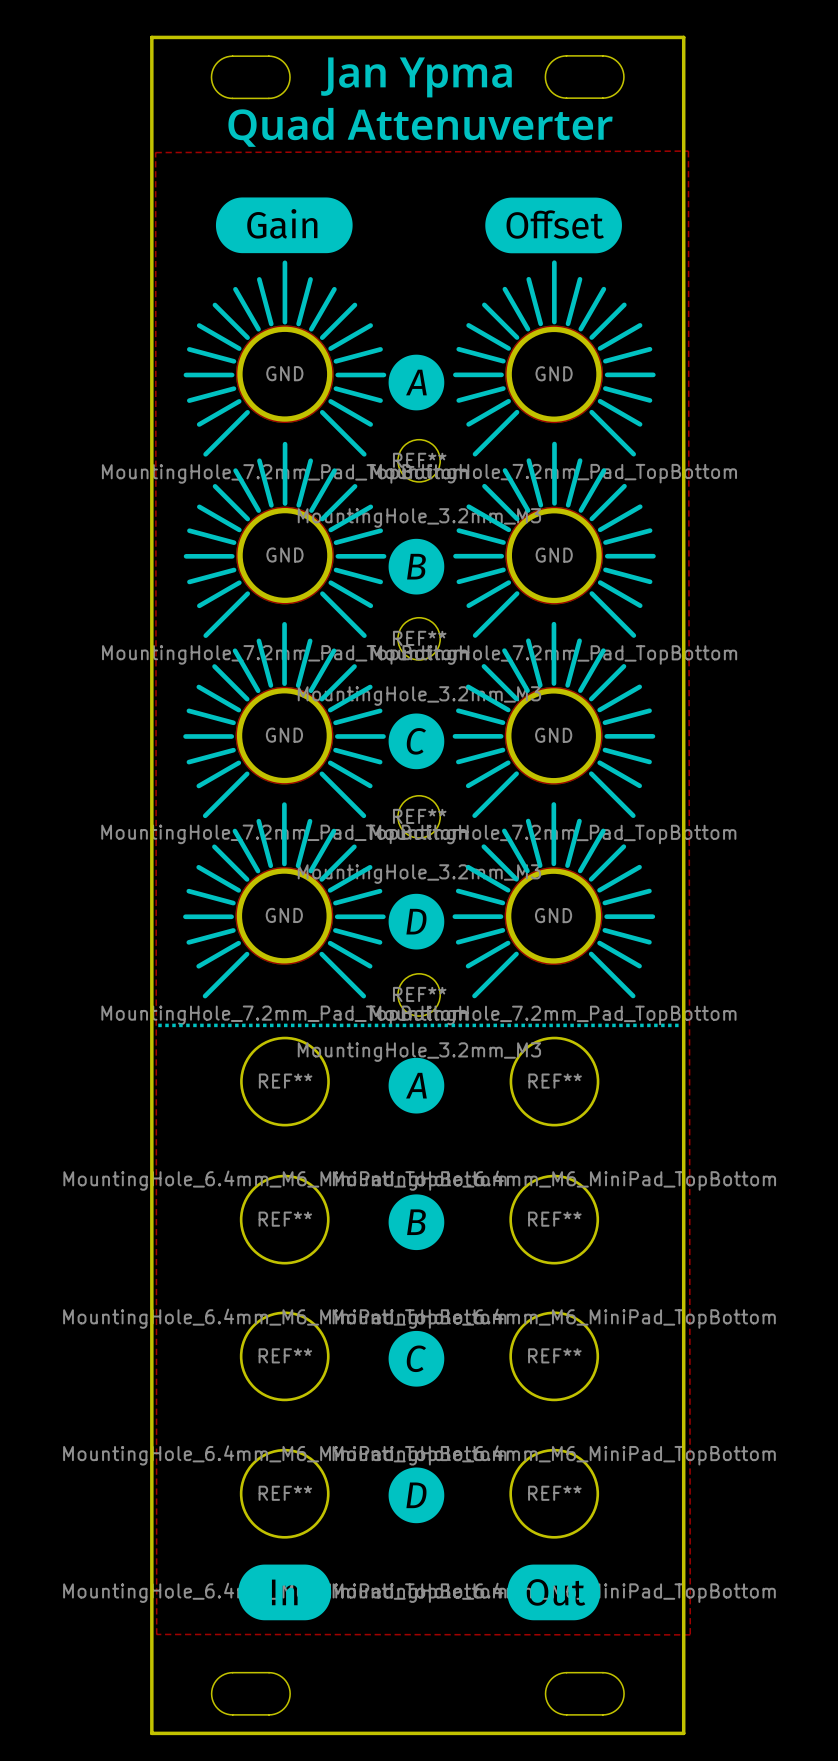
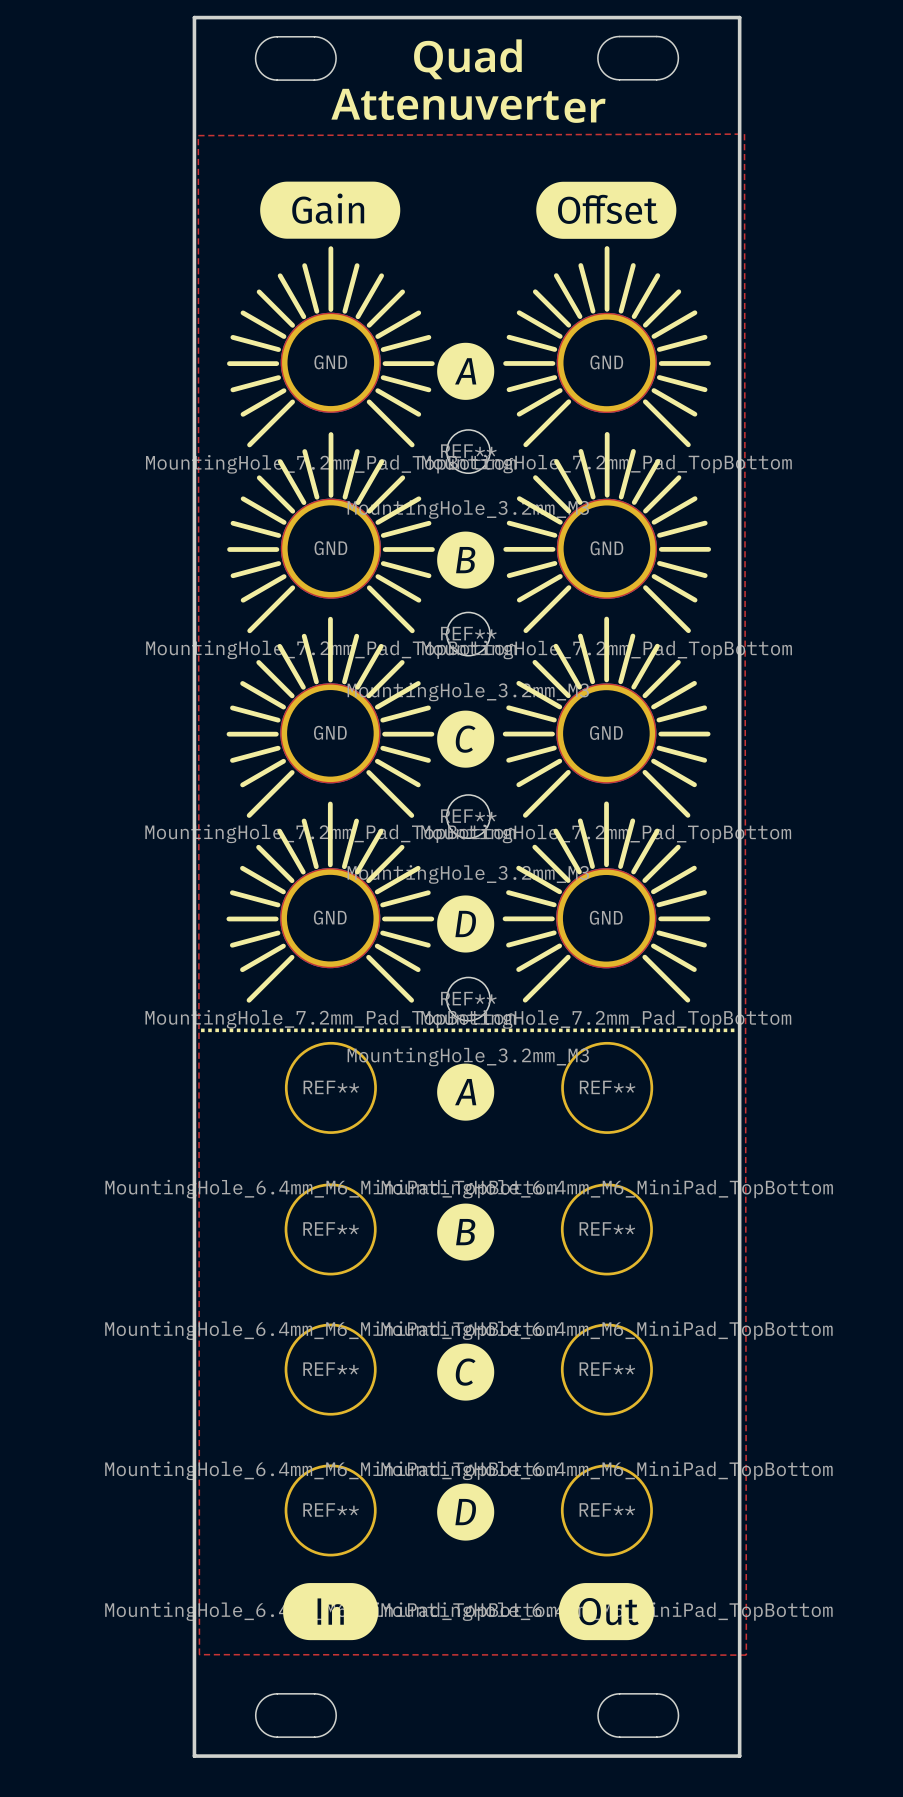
drawing: [321, 57, 386, 96] -> none
drawing shape: [399, 57, 425, 88] -> [448, 48, 470, 73]
drawing shape: [427, 64, 448, 98] -> [474, 48, 495, 73]
drawing: [453, 64, 512, 88] -> none
drawing: none -> [361, 91, 419, 121]
drawing: none -> [543, 91, 559, 121]
drawing shape: [376, 112, 392, 141] -> [423, 95, 445, 120]
drawing: [393, 112, 485, 141] -> none
drawing: [554, 112, 594, 141] -> none
drawing: none -> [500, 95, 522, 121]
drawing: none -> [450, 96, 472, 121]
drawing: [262, 116, 308, 141] -> none
drawing position: (323, 124) -> (511, 55)
drawing position: (361, 124) -> (345, 104)
drawing position: (242, 128) -> (428, 60)
drawing position: (499, 128) -> (486, 107)
drawing position: (605, 128) -> (534, 107)

